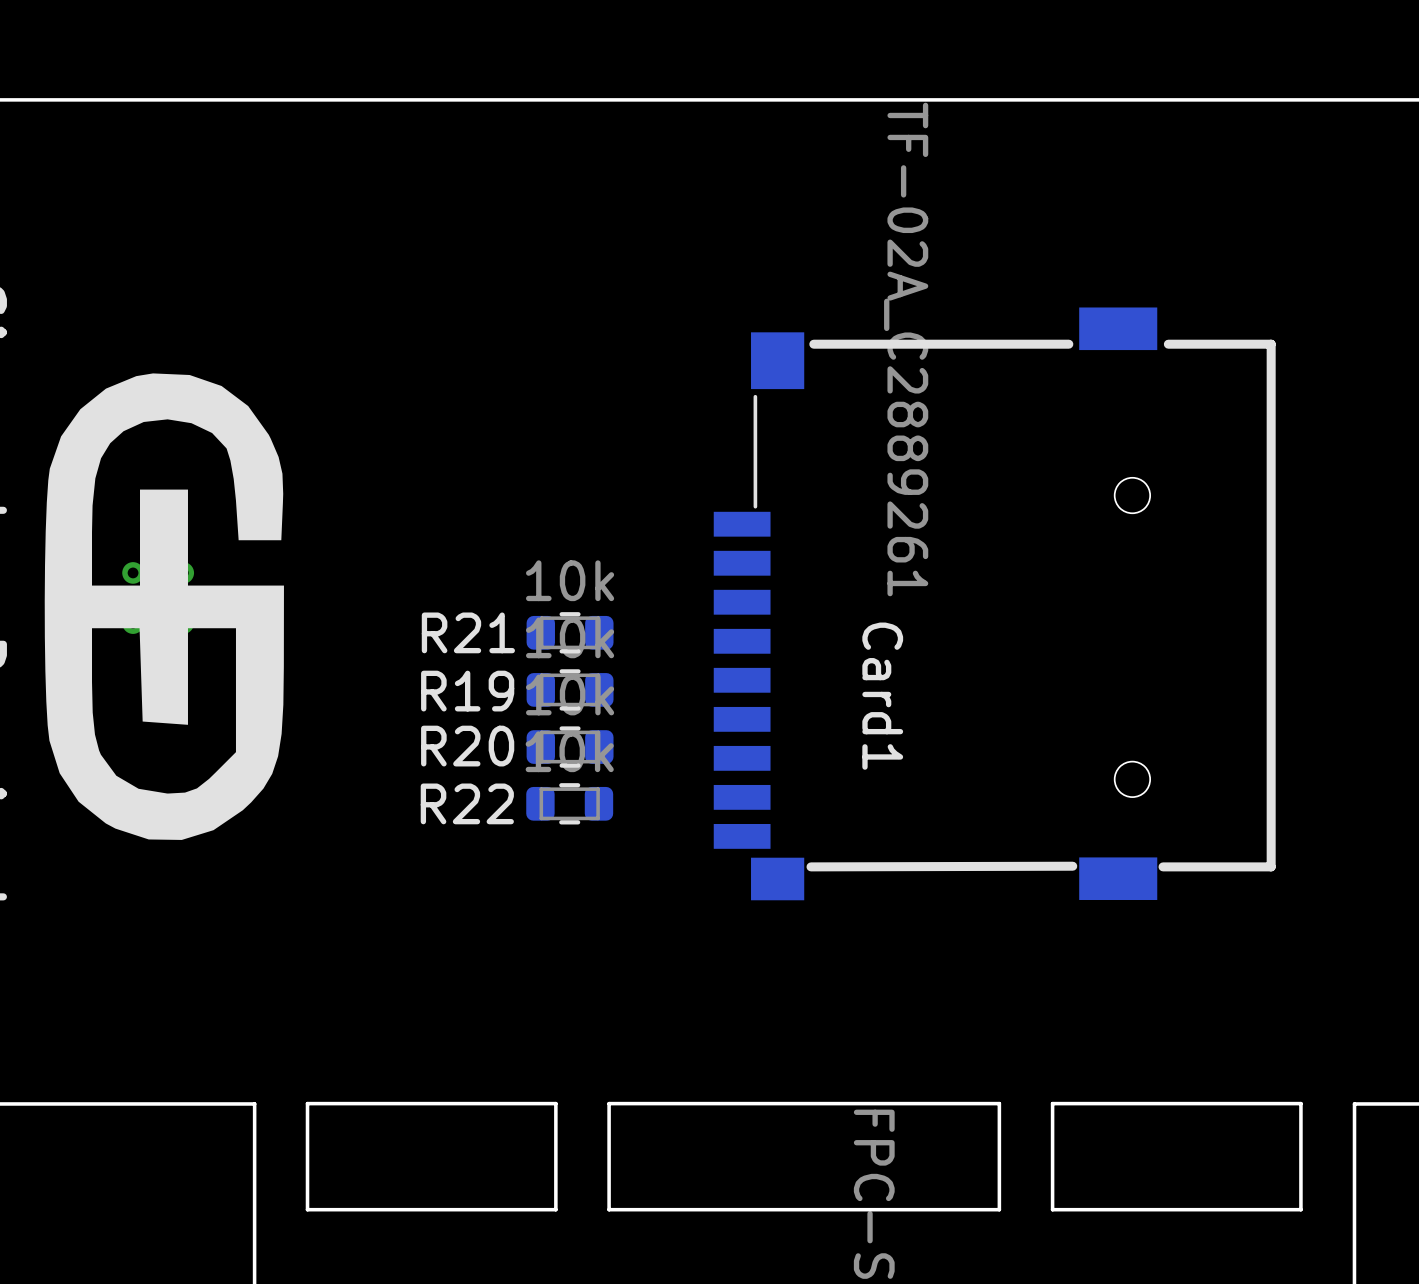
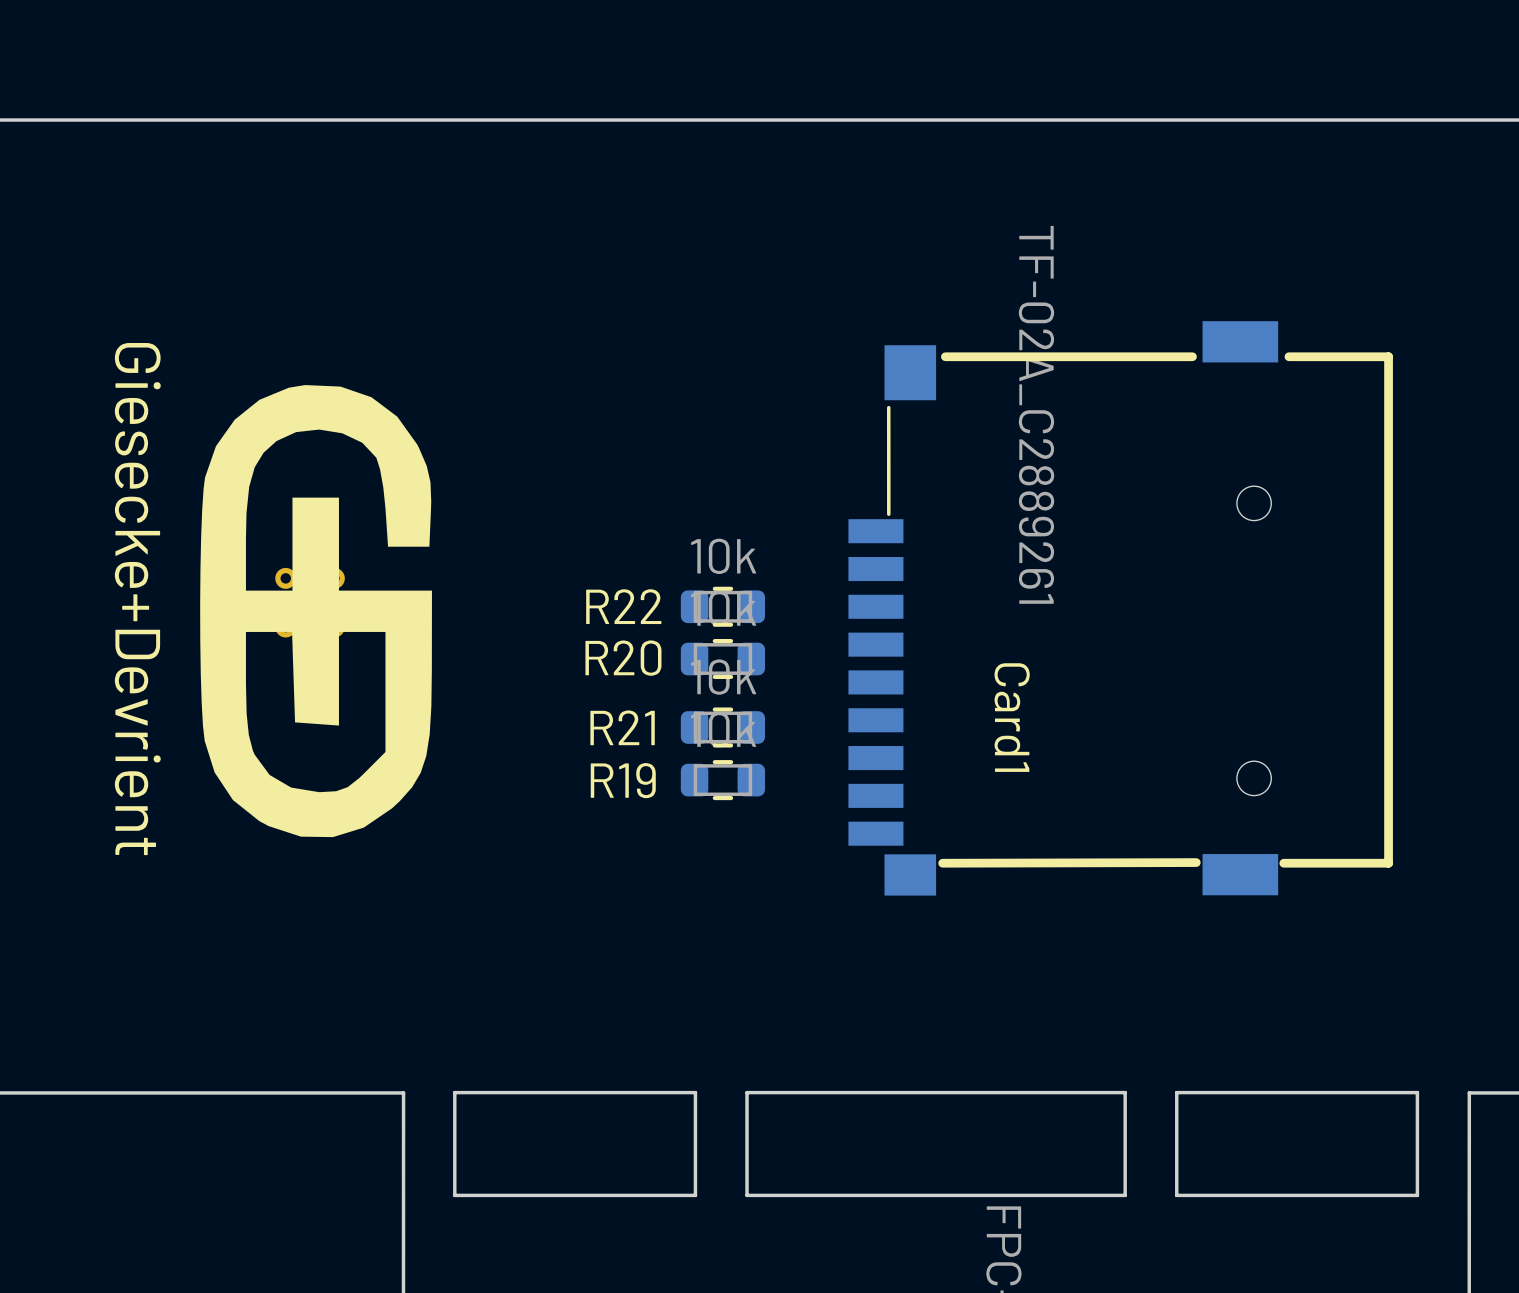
R21 name position: R21 (468, 632) -> R21 (622, 727)
R19 position: (570, 632) -> (722, 780)
R21 position: (570, 689) -> (722, 727)
R19 name position: R19 (467, 691) -> R19 (623, 780)
R20 position: (570, 747) -> (722, 659)
R22 position: (569, 803) -> (722, 606)

